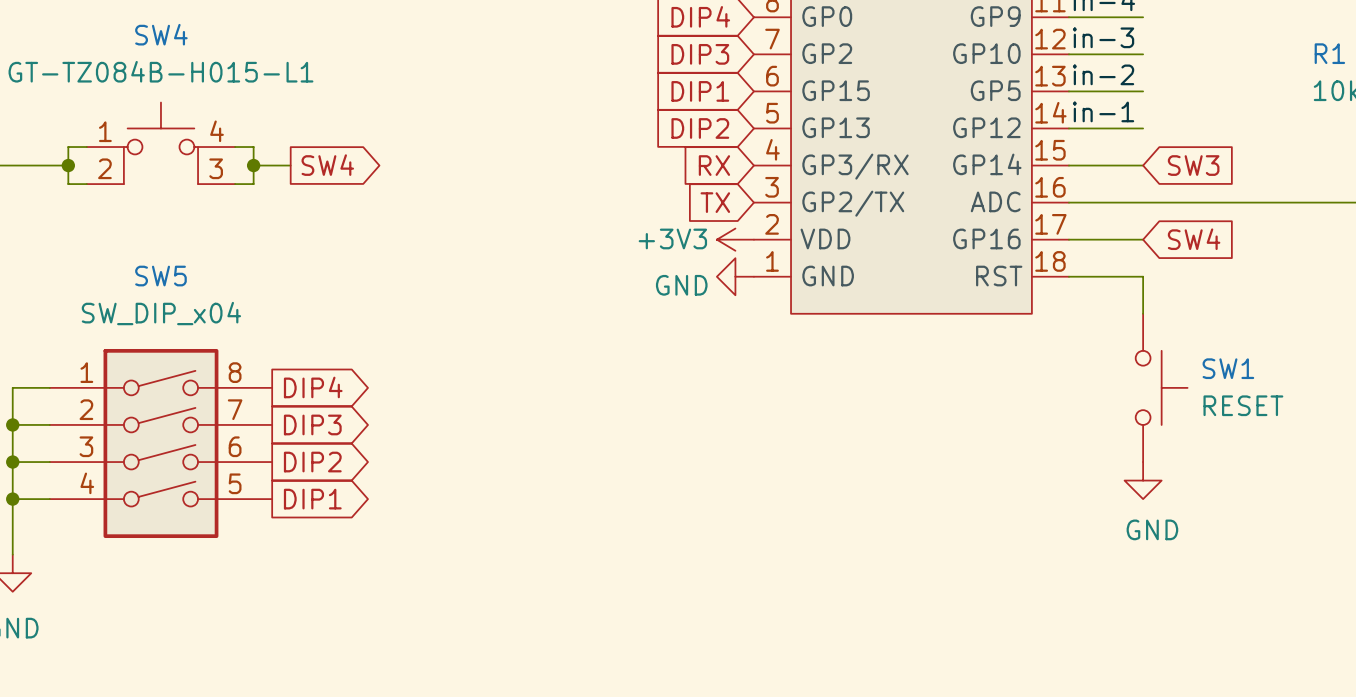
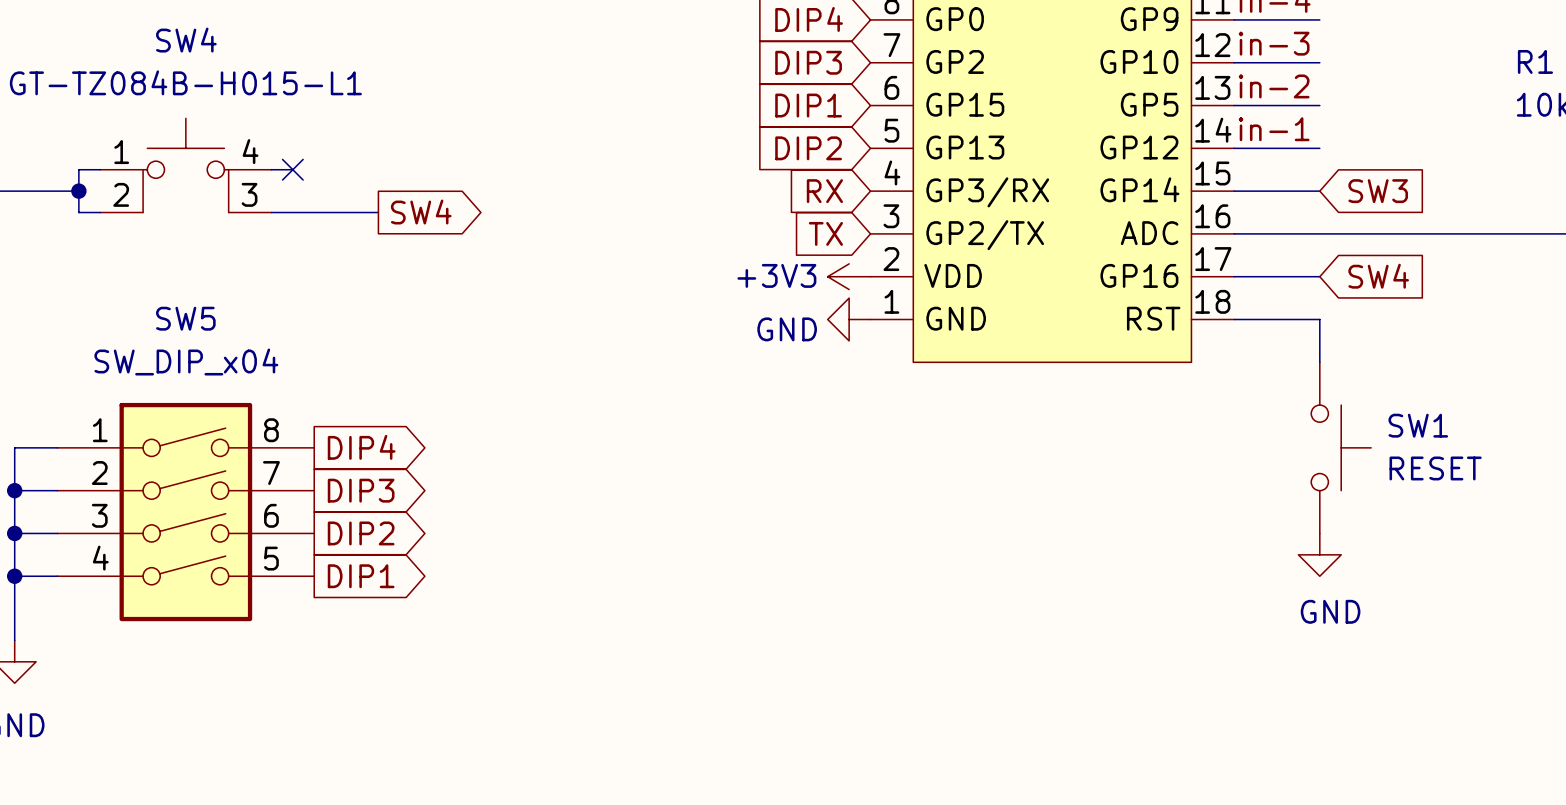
wire: (253, 147) (253, 184) -> (378, 212) (292, 212)
no-connect mark: none -> (292, 169)
wire: (253, 165) (290, 165) -> none
junction: (253, 165) -> none
global label position: SW4 (327, 165) -> SW4 (421, 212)

